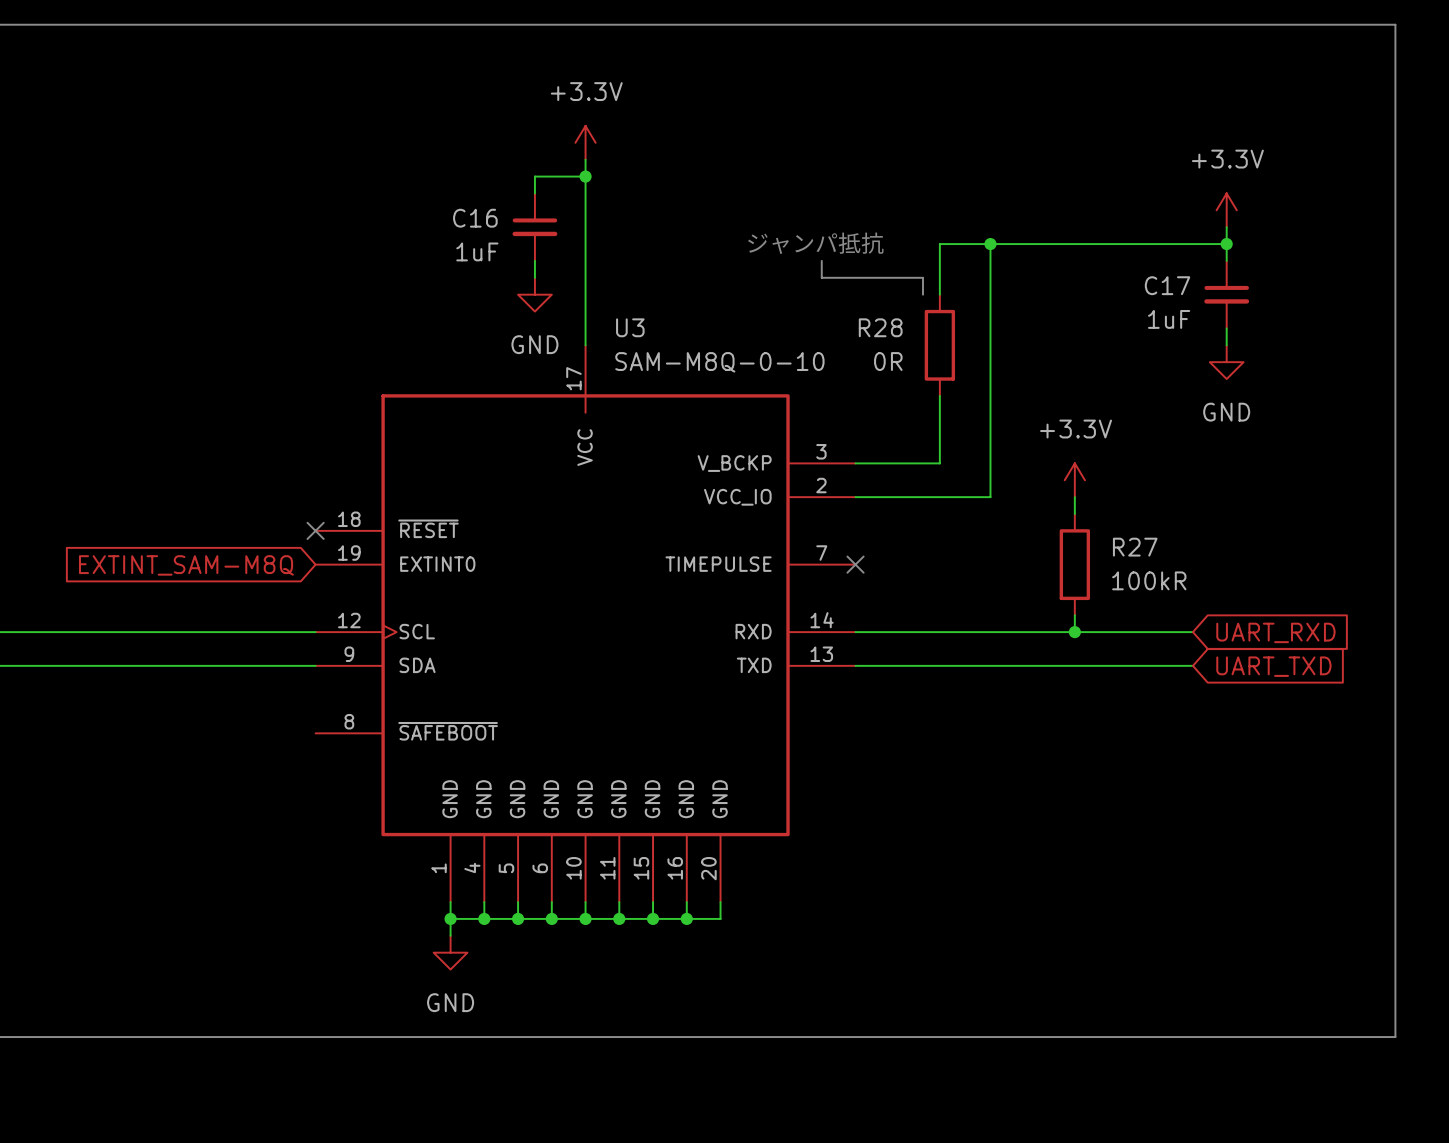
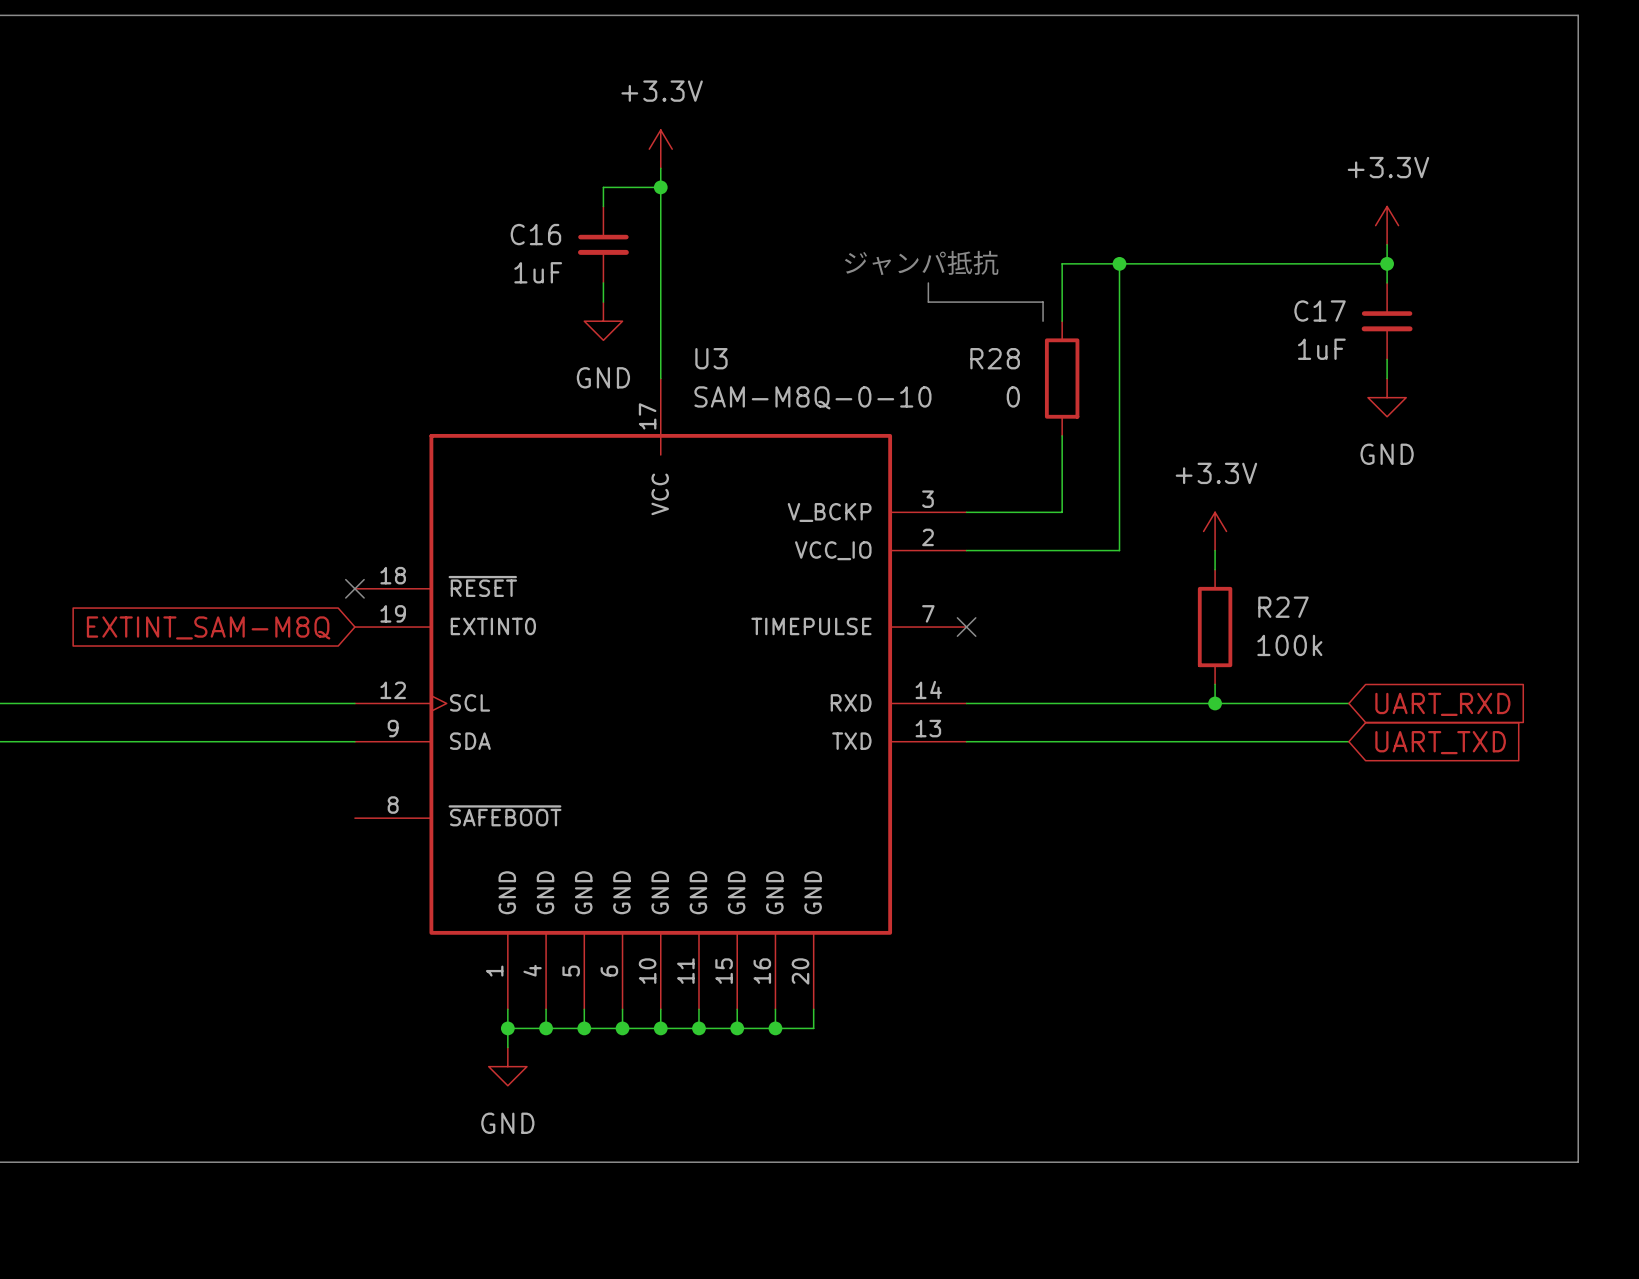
R28 value: 0R (888, 361) -> 0 (1013, 396)
R27 value: 100kR (1149, 580) -> 100k (1289, 645)

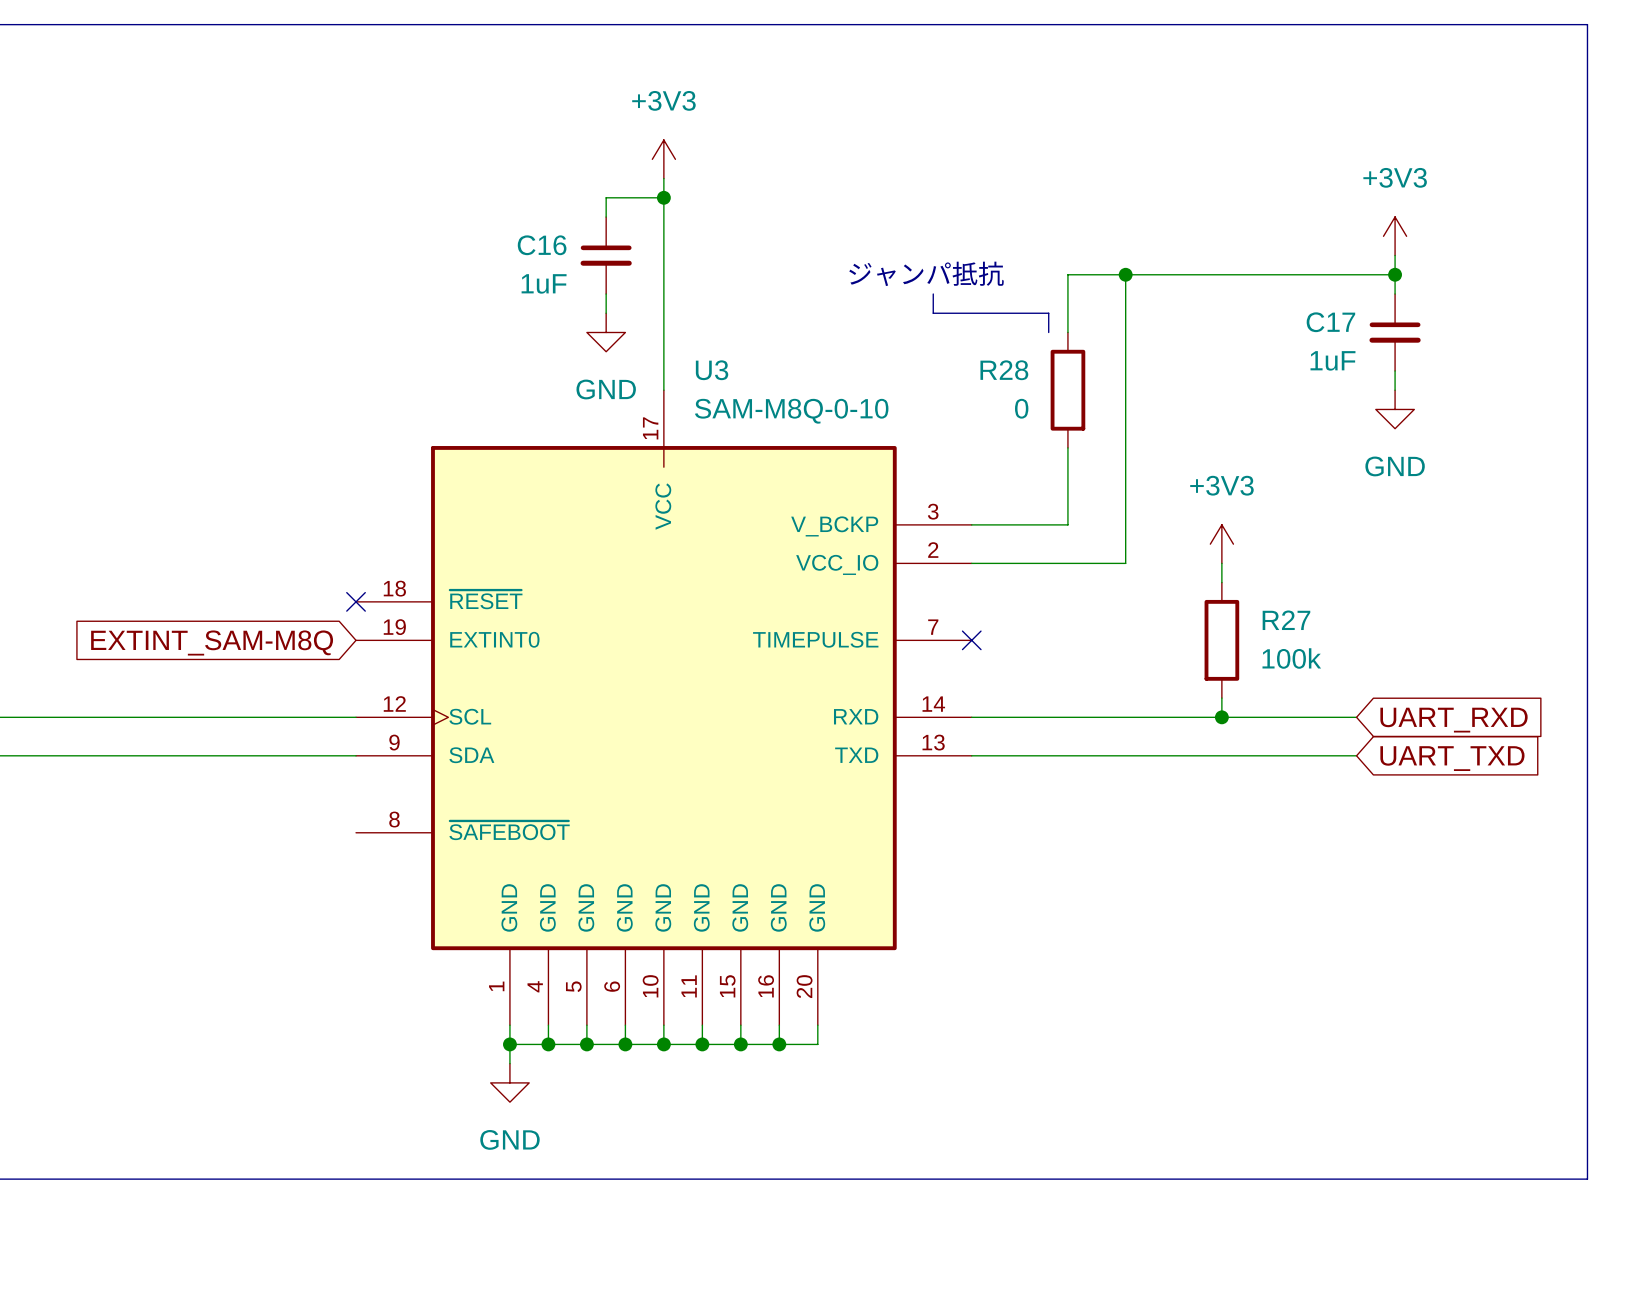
power symbol: +3.3V (660, 149) -> +3V3 (663, 159)
power symbol: +3.3V (1387, 225) -> +3V3 (1395, 236)
power symbol: +3.3V (1215, 531) -> +3V3 (1221, 544)

